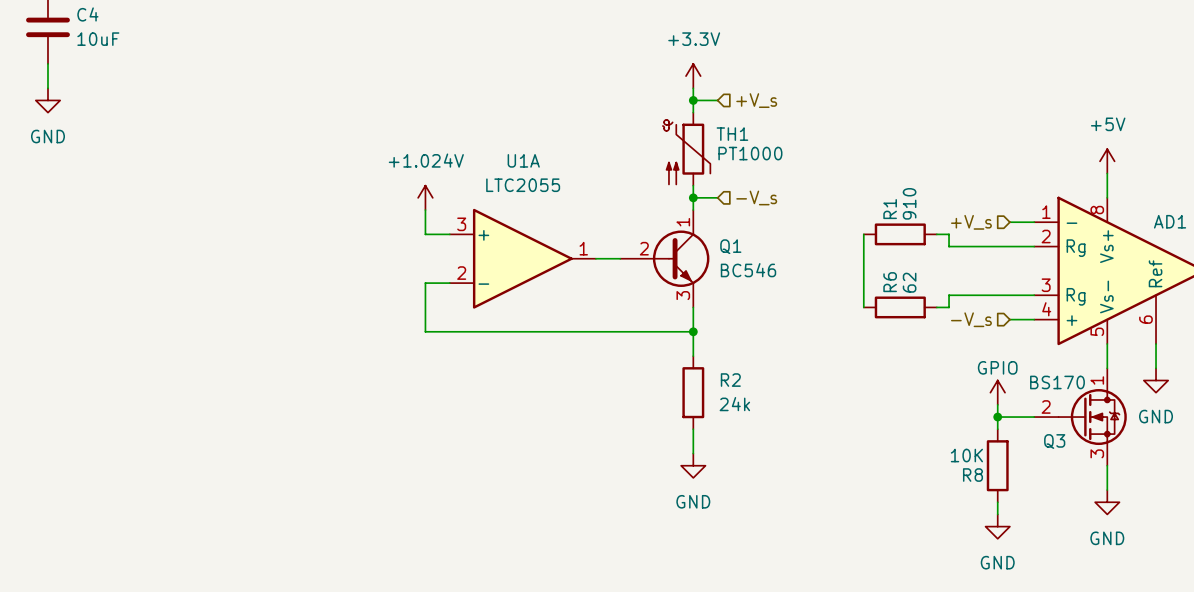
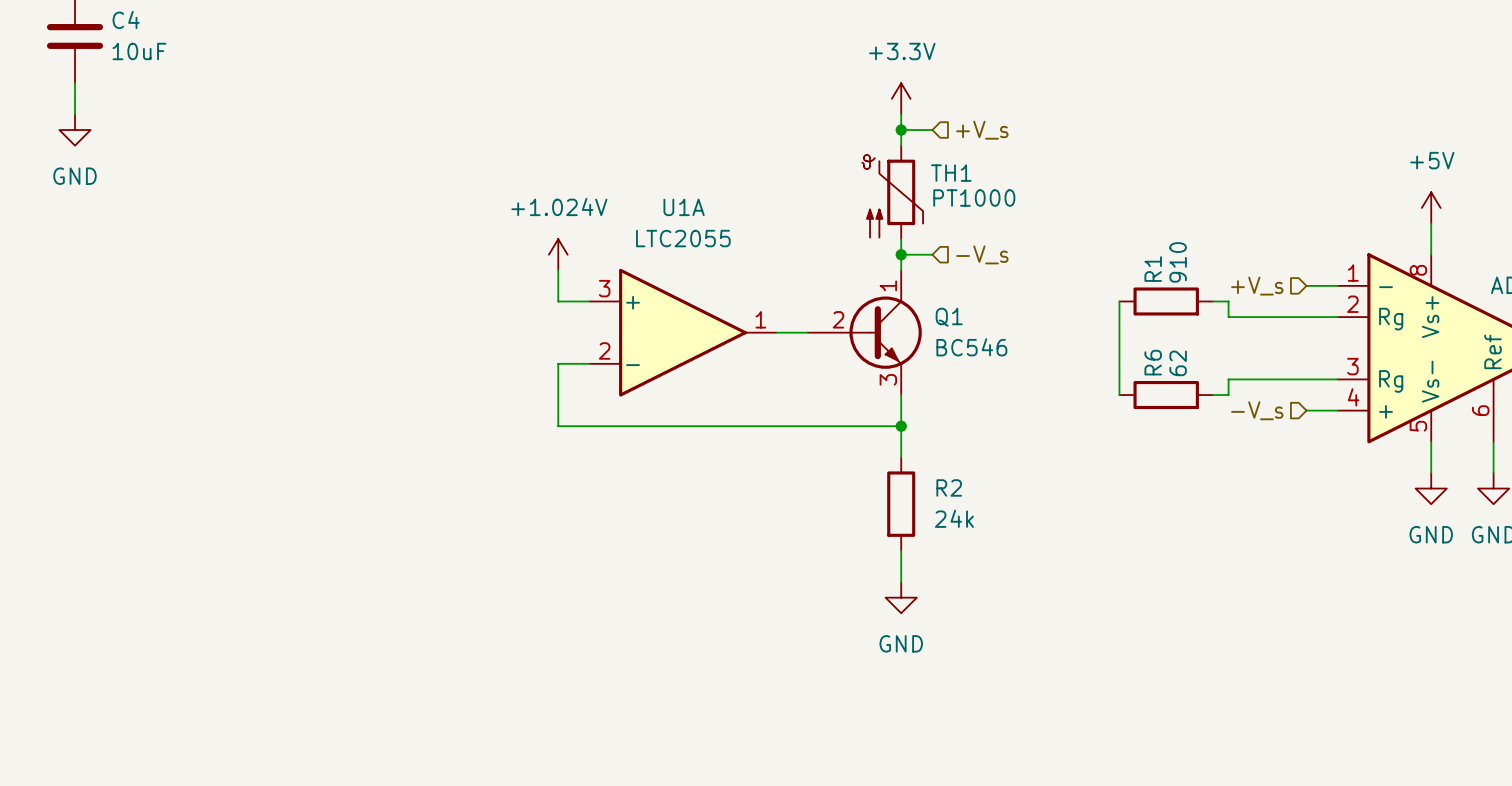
power symbol: none -> GND (1431, 488)
power symbol: GPIO (997, 392) -> none
wire: (997, 404) (997, 429) -> none
wire: (997, 417) (1034, 417) -> none
junction: (997, 417) -> none
Q3: BS170 (1080, 417) -> none
R8: 10K (997, 465) -> none
wire: (1107, 465) (1107, 490) -> none
wire: (997, 502) (997, 514) -> none
power symbol: GND (1107, 502) -> none
power symbol: GND (997, 526) -> none

